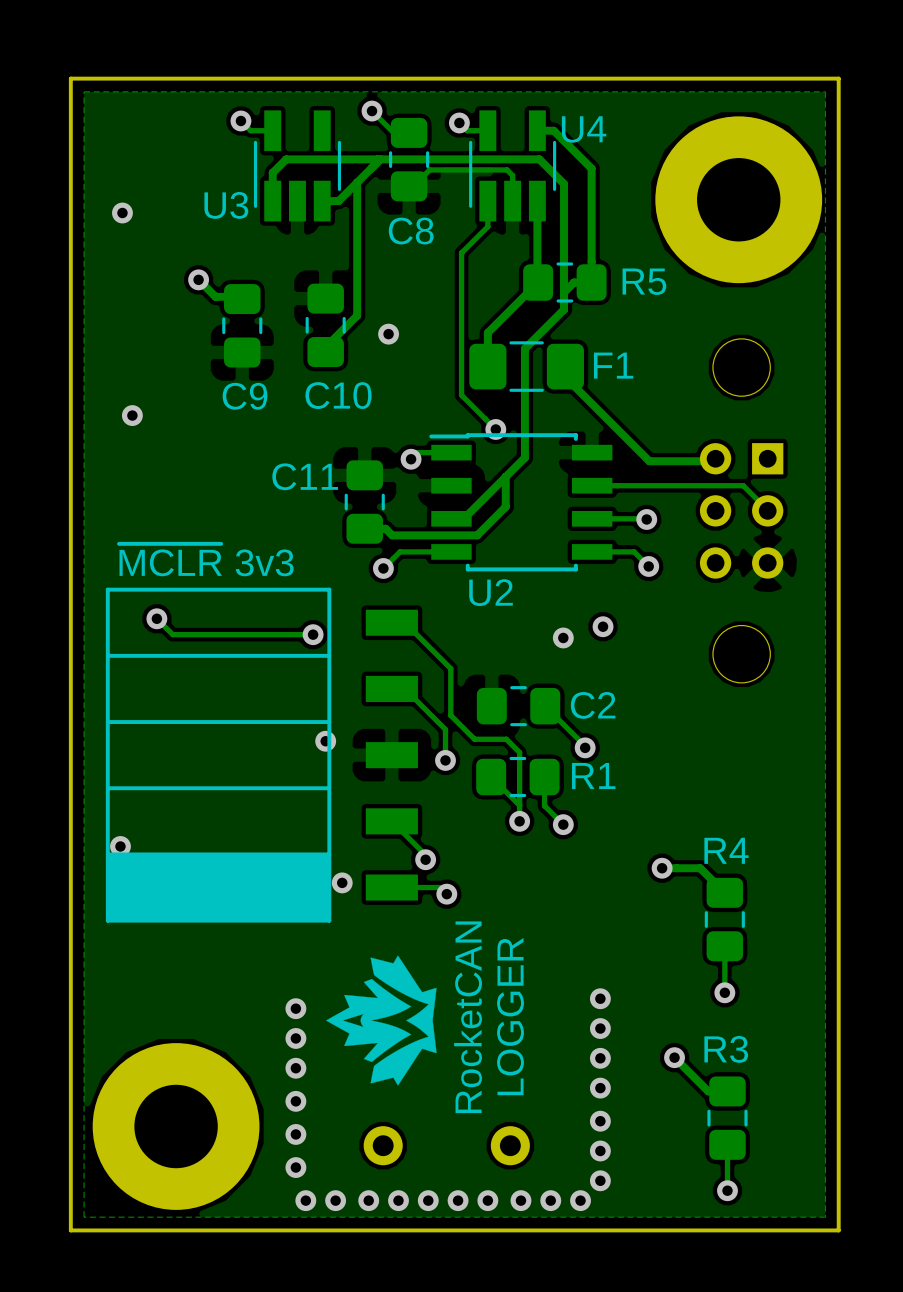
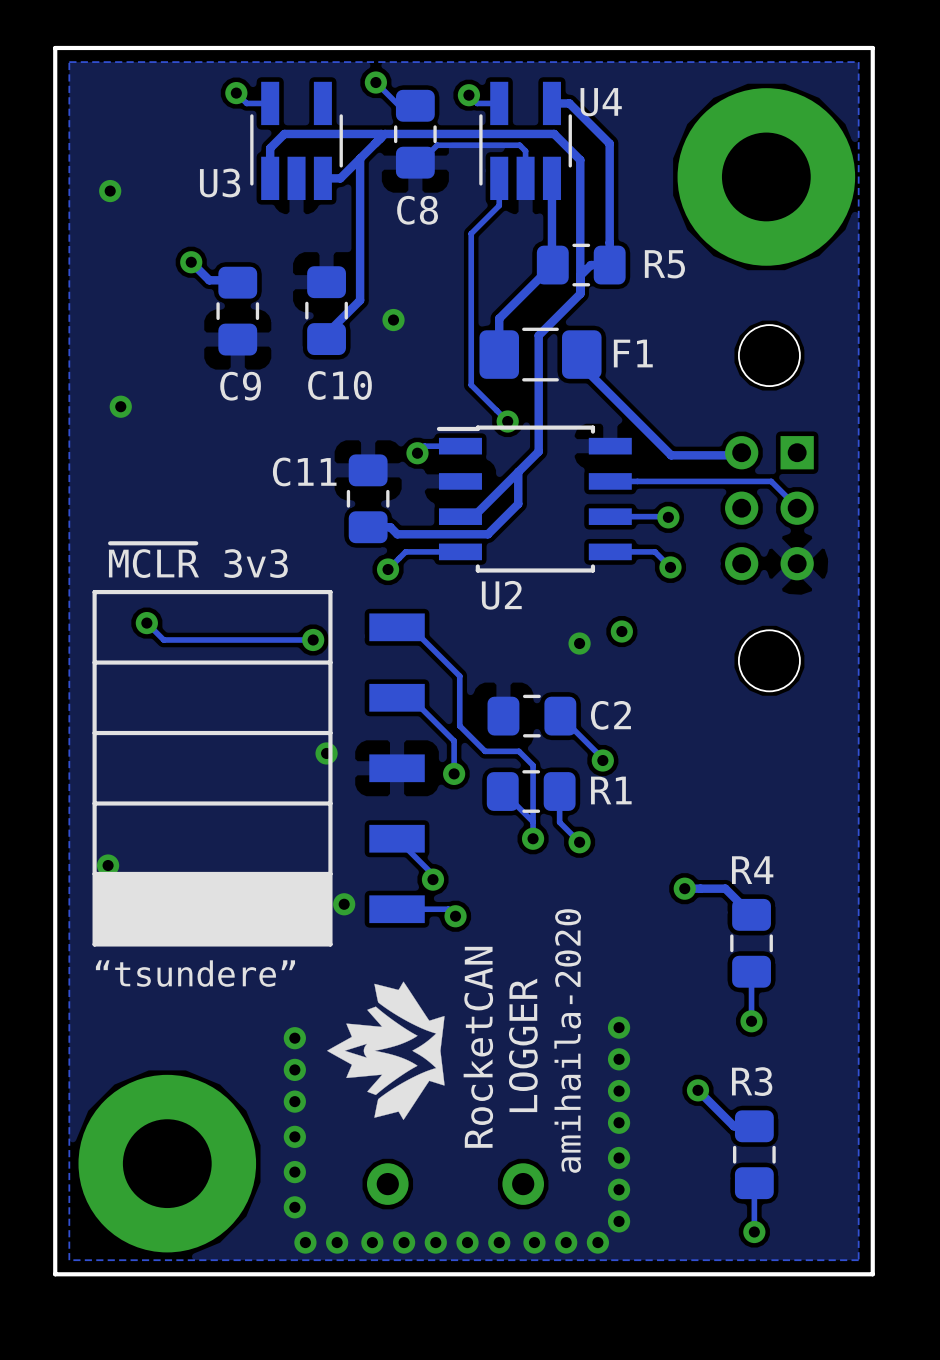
text: none -> “tsundere” (195, 973)
text: none -> amihaila-2020 (567, 1041)

